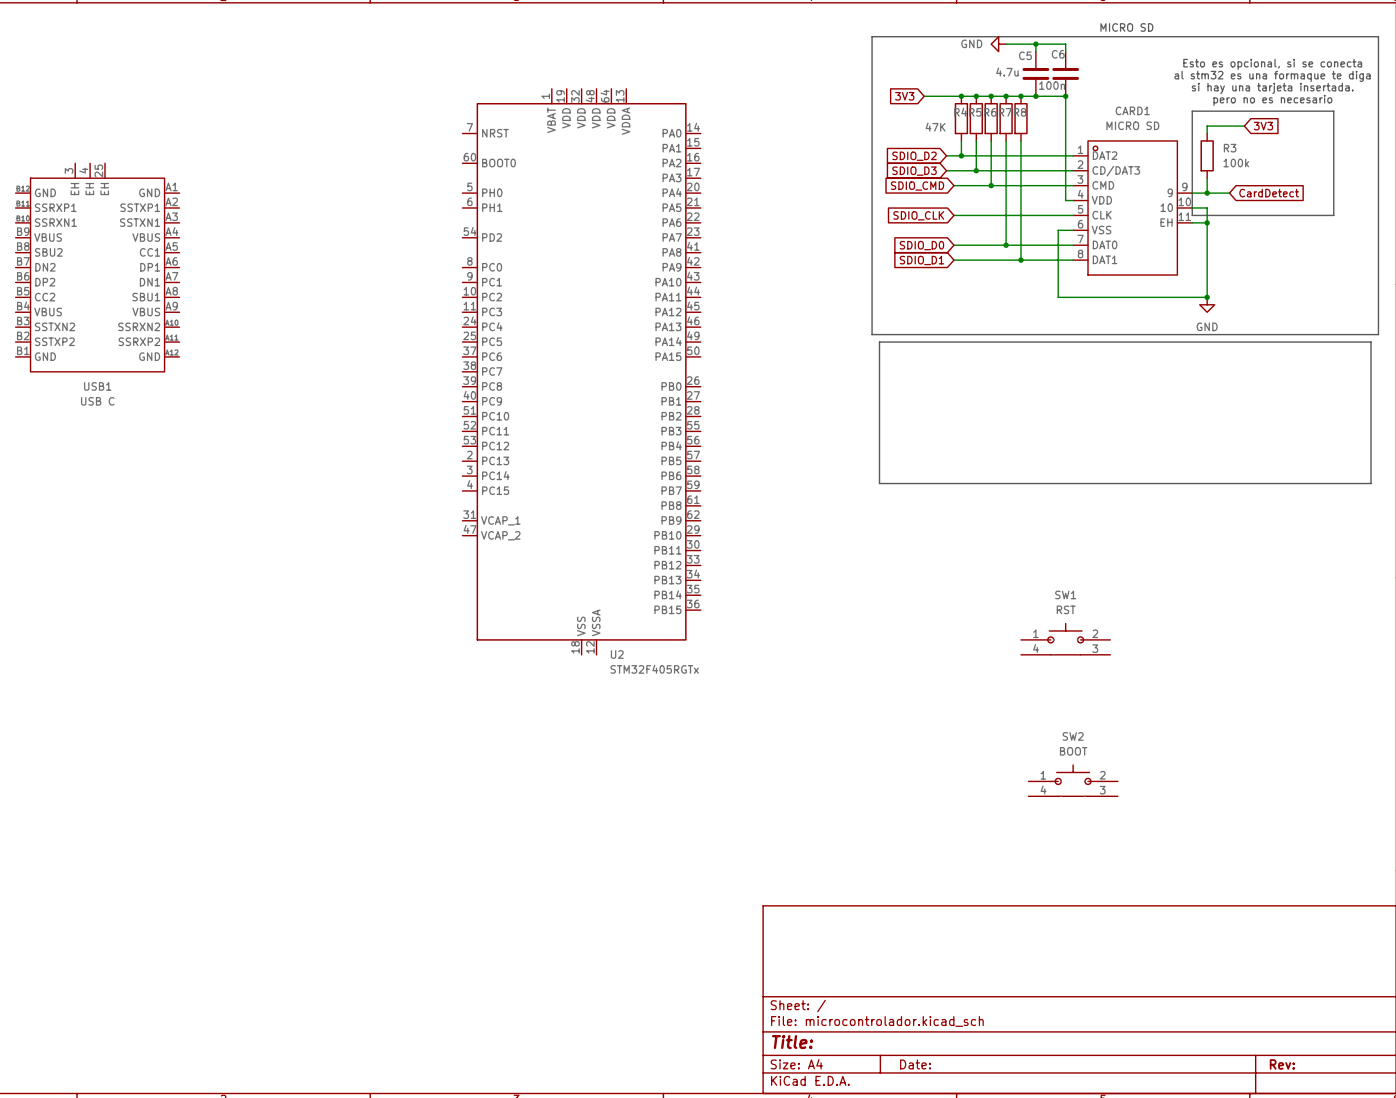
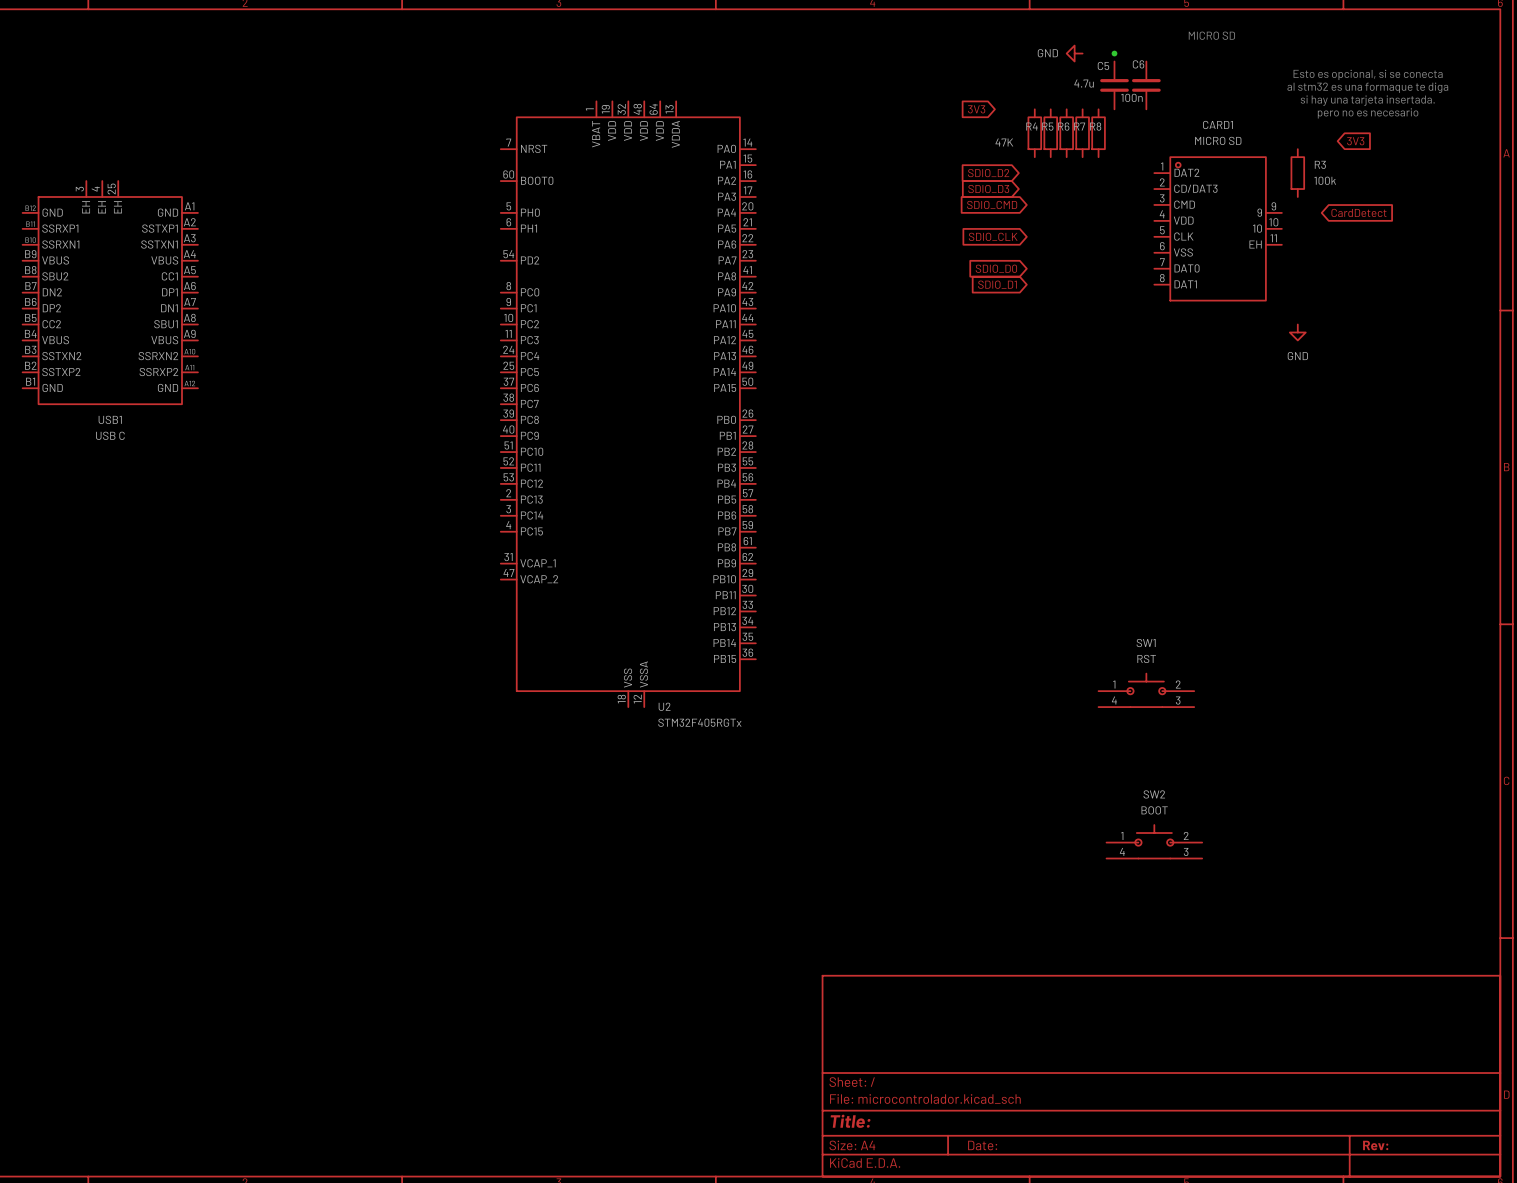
line: (872, 36) (1378, 36) (1378, 334) (872, 334) (872, 36) -> none
wire: (1006, 44) (1065, 44) (1065, 51) -> none
wire: (1035, 44) (1035, 51) -> none
wire: (924, 96) (1065, 96) (1065, 200) (1073, 200) -> none
junction: (961, 96) -> none
junction: (976, 96) -> none
junction: (991, 96) -> none
junction: (1006, 96) -> none
junction: (1020, 96) -> none
junction: (1035, 96) -> none
junction: (1065, 96) -> none
line: (1192, 111) (1333, 111) (1333, 215) (1192, 215) (1192, 111) -> none
wire: (1244, 126) (1207, 126) (1207, 133) -> none
wire: (961, 140) (961, 155) -> none
wire: (976, 140) (976, 170) -> none
wire: (991, 140) (991, 185) -> none
wire: (1006, 140) (1006, 245) -> none
wire: (1020, 140) (1020, 260) -> none
wire: (946, 155) (1073, 155) -> none
junction: (961, 155) -> none
wire: (946, 170) (1073, 170) -> none
junction: (976, 170) -> none
wire: (1207, 178) (1207, 193) -> none
wire: (953, 185) (1073, 185) -> none
junction: (991, 185) -> none
wire: (1192, 193) (1229, 193) -> none
junction: (1207, 193) -> none
wire: (1192, 207) (1207, 207) (1207, 297) (1058, 297) (1058, 230) (1073, 230) -> none
wire: (953, 215) (1073, 215) -> none
wire: (1192, 222) (1207, 222) -> none
junction: (1207, 222) -> none
wire: (953, 245) (1073, 245) -> none
junction: (1006, 245) -> none
wire: (953, 260) (1073, 260) -> none
junction: (1020, 260) -> none
junction: (1207, 297) -> none
line: (879, 342) (1371, 342) (1371, 483) (879, 483) (879, 342) -> none

